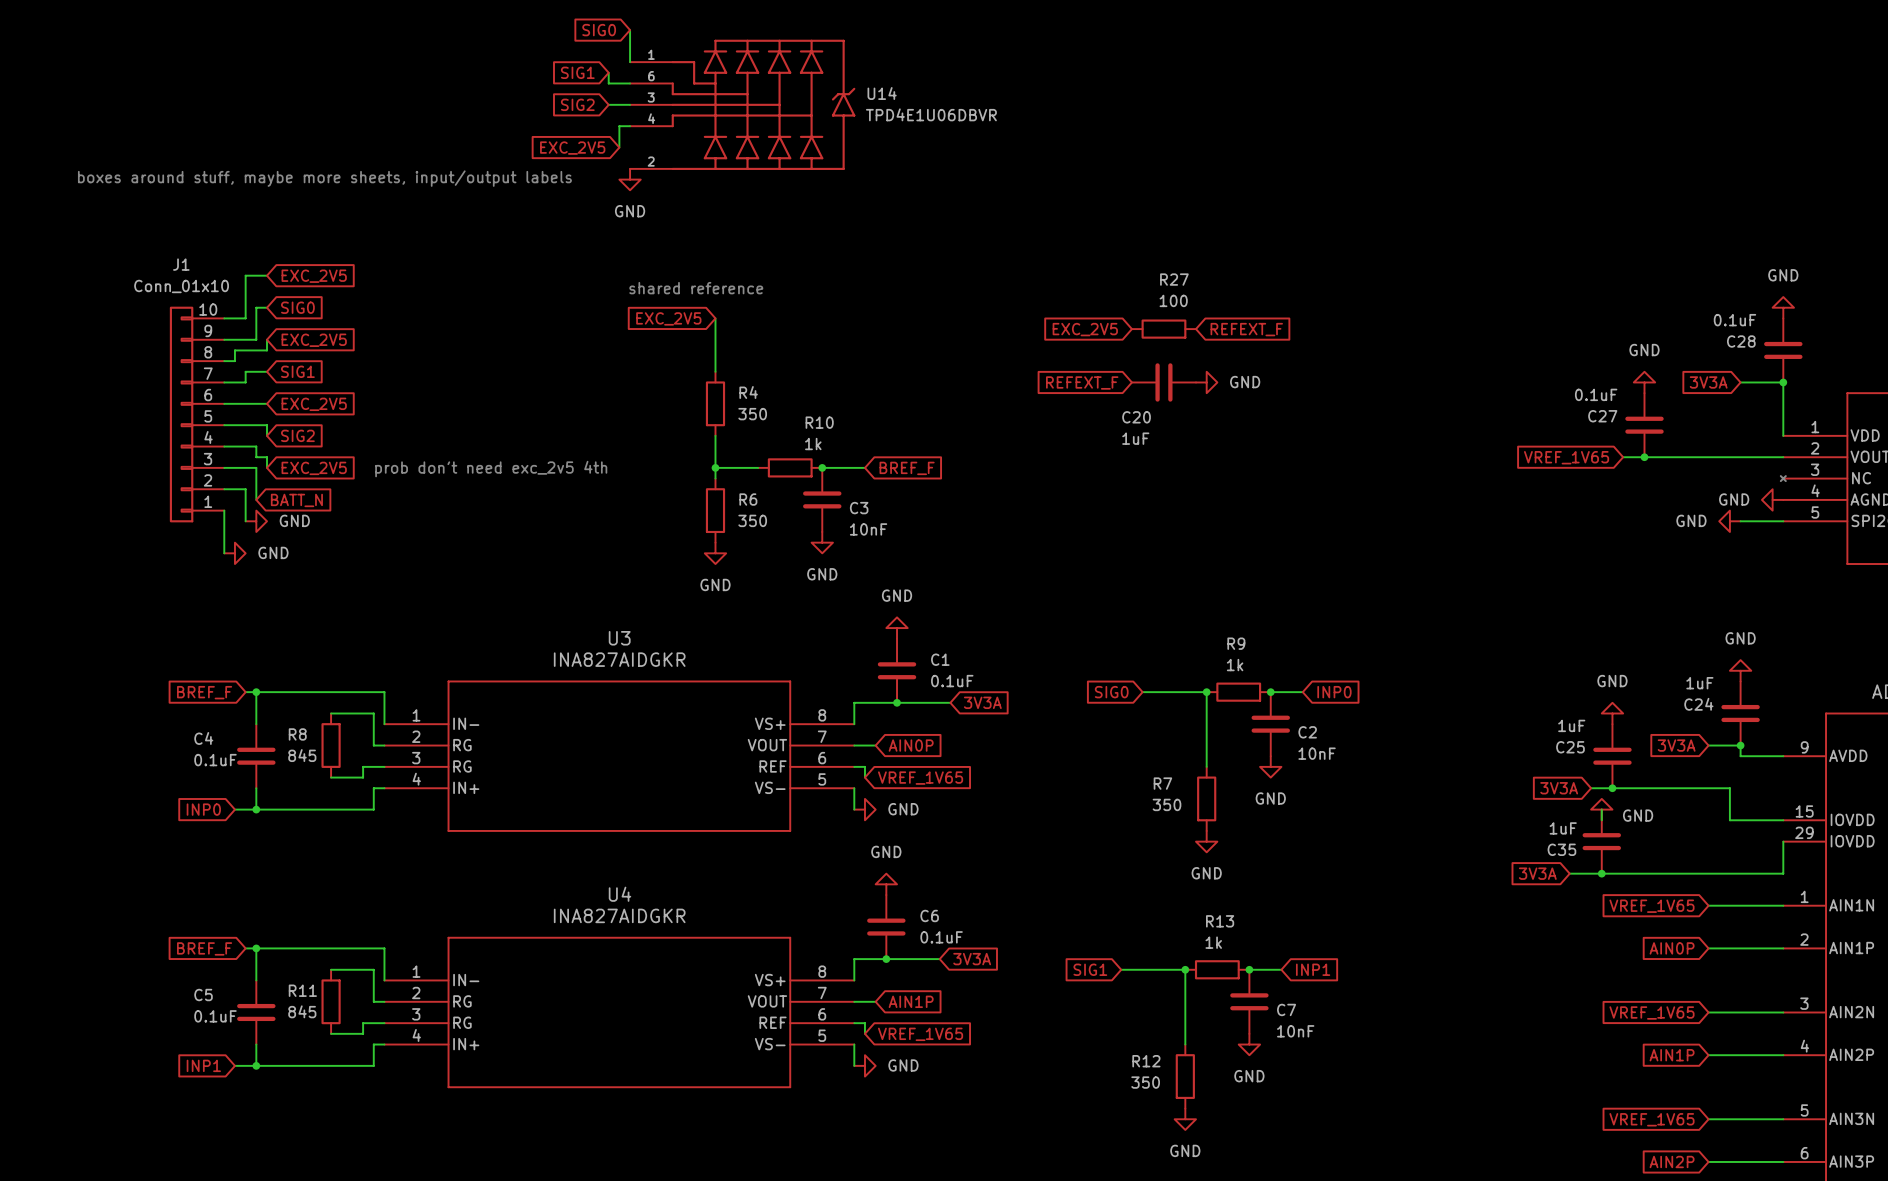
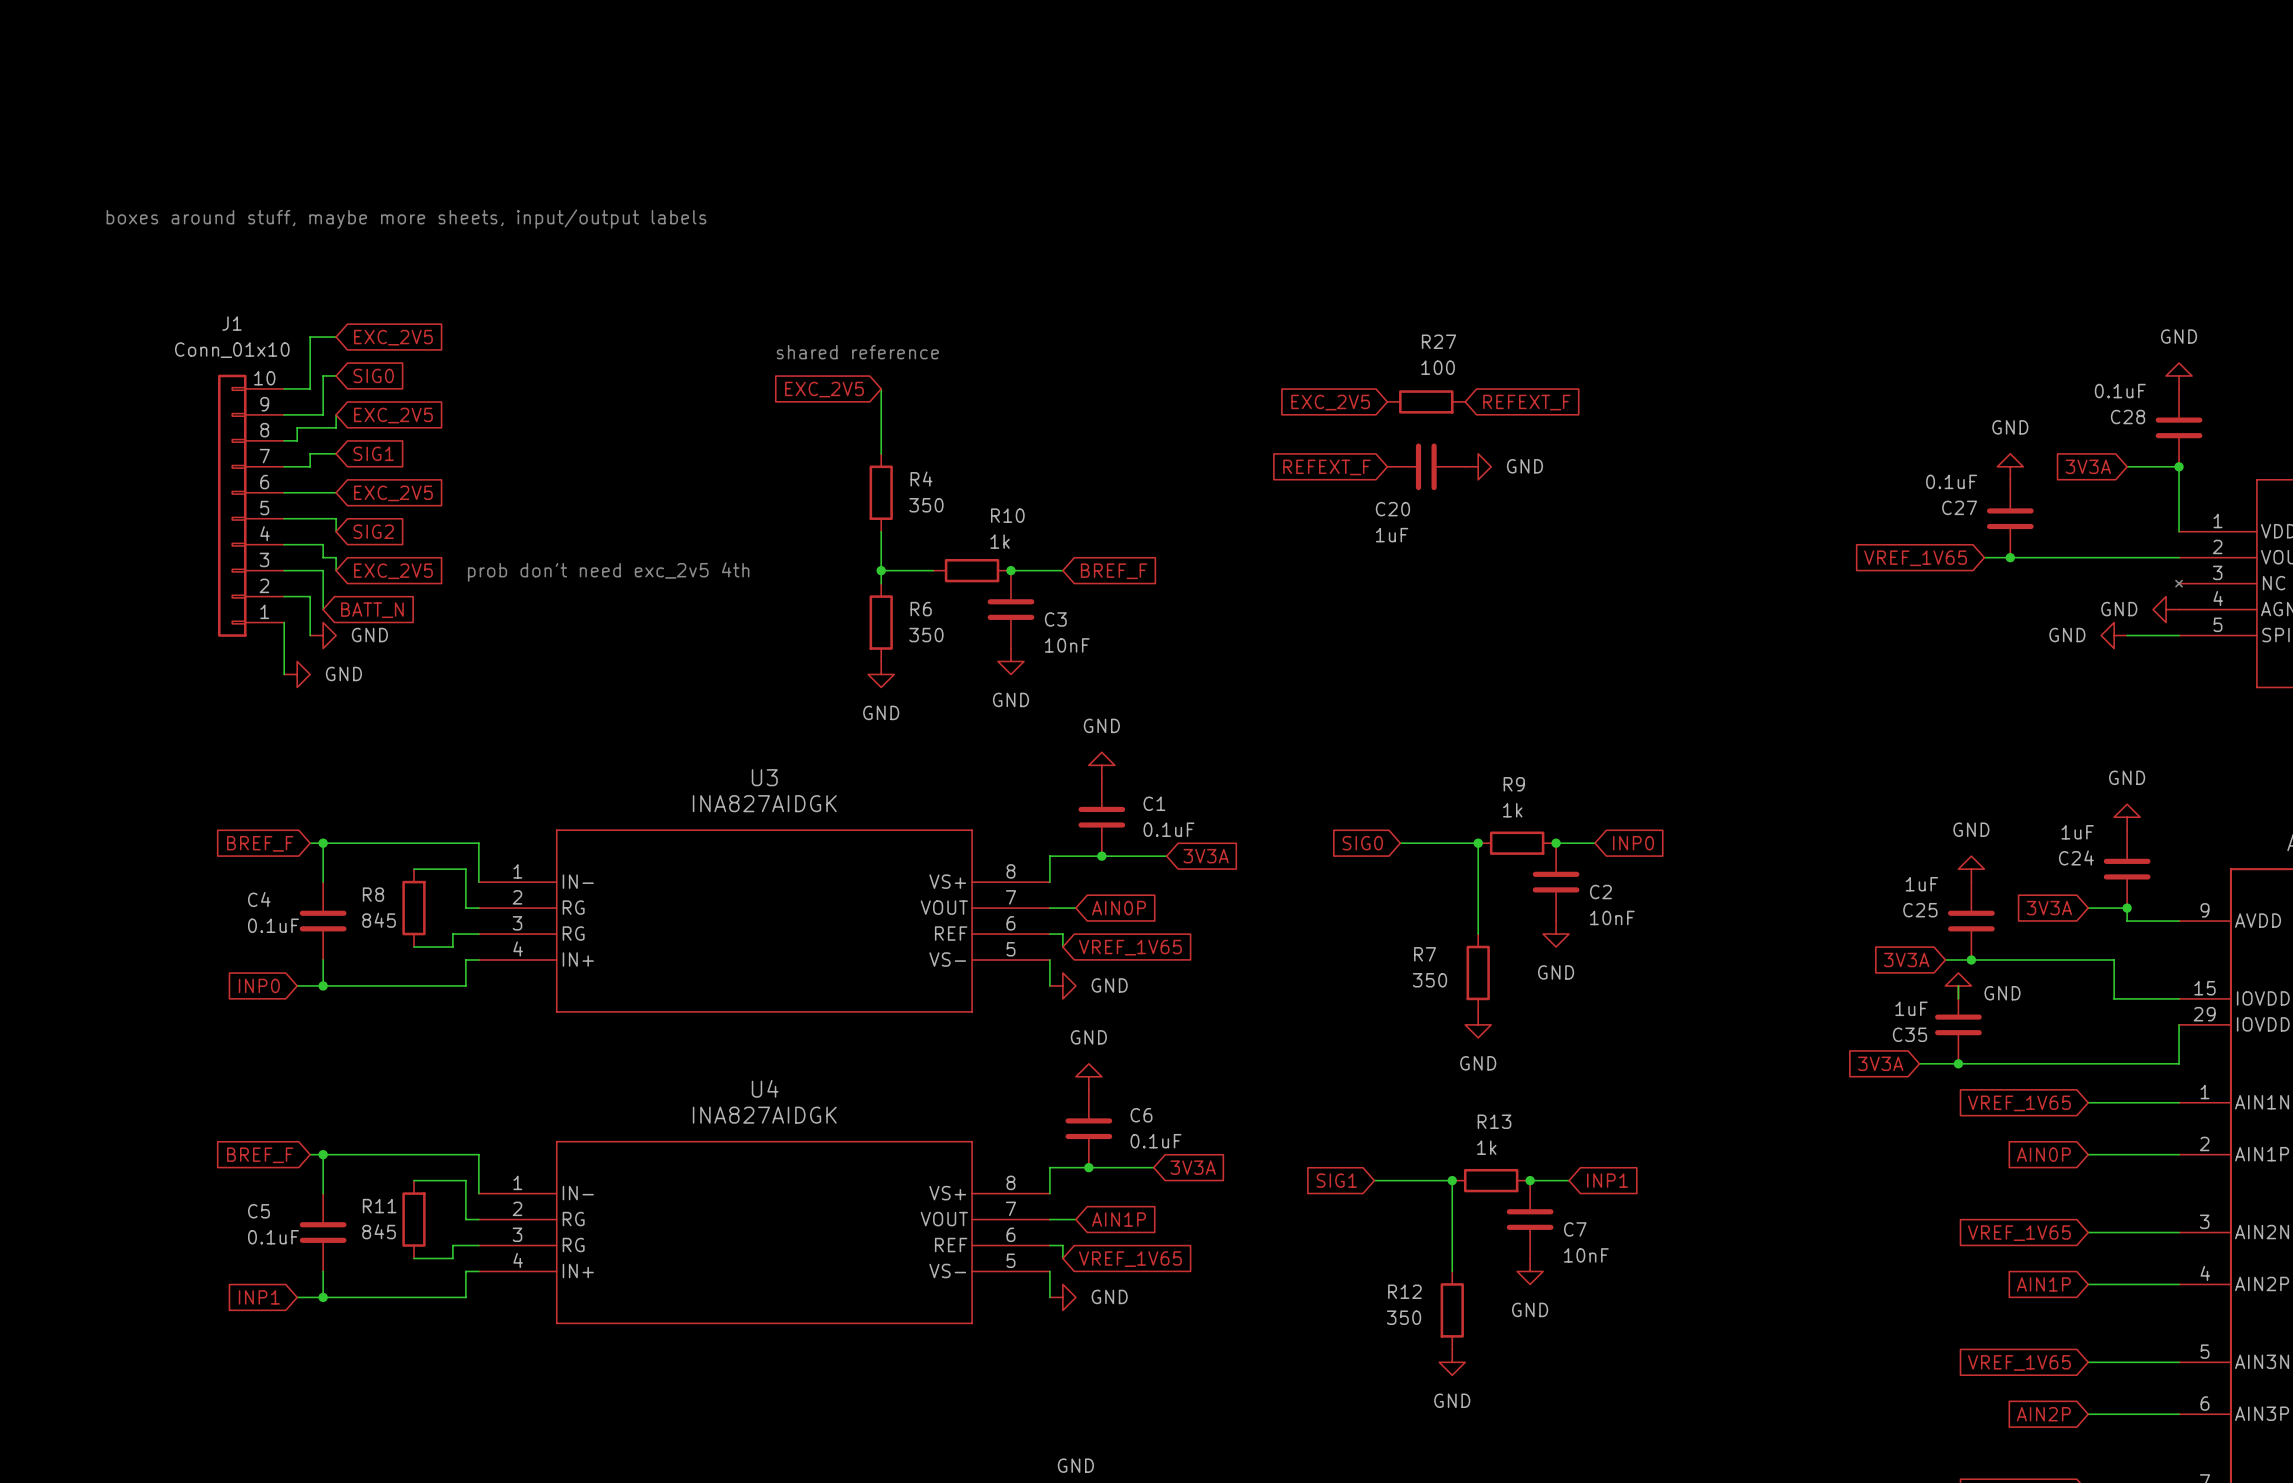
global label: SIG0 (599, 30) -> none
wire: (630, 30) (630, 62) -> none
global label: SIG1 (577, 72) -> none
wire: (608, 72) (608, 83) (630, 83) -> none
global label: SIG2 (577, 104) -> none
wire: (608, 104) (630, 104) -> none
U14: TPD4E1U06DBVR (742, 104) -> none
wire: (630, 126) (619, 126) (619, 147) -> none
global label: EXC_2V5 (572, 148) -> none
power symbol: GND (630, 179) -> none
U3 value: INA827AIDGKR (619, 659) -> INA827AIDGK (764, 803)
U4 value: INA827AIDGKR (619, 915) -> INA827AIDGK (764, 1115)

